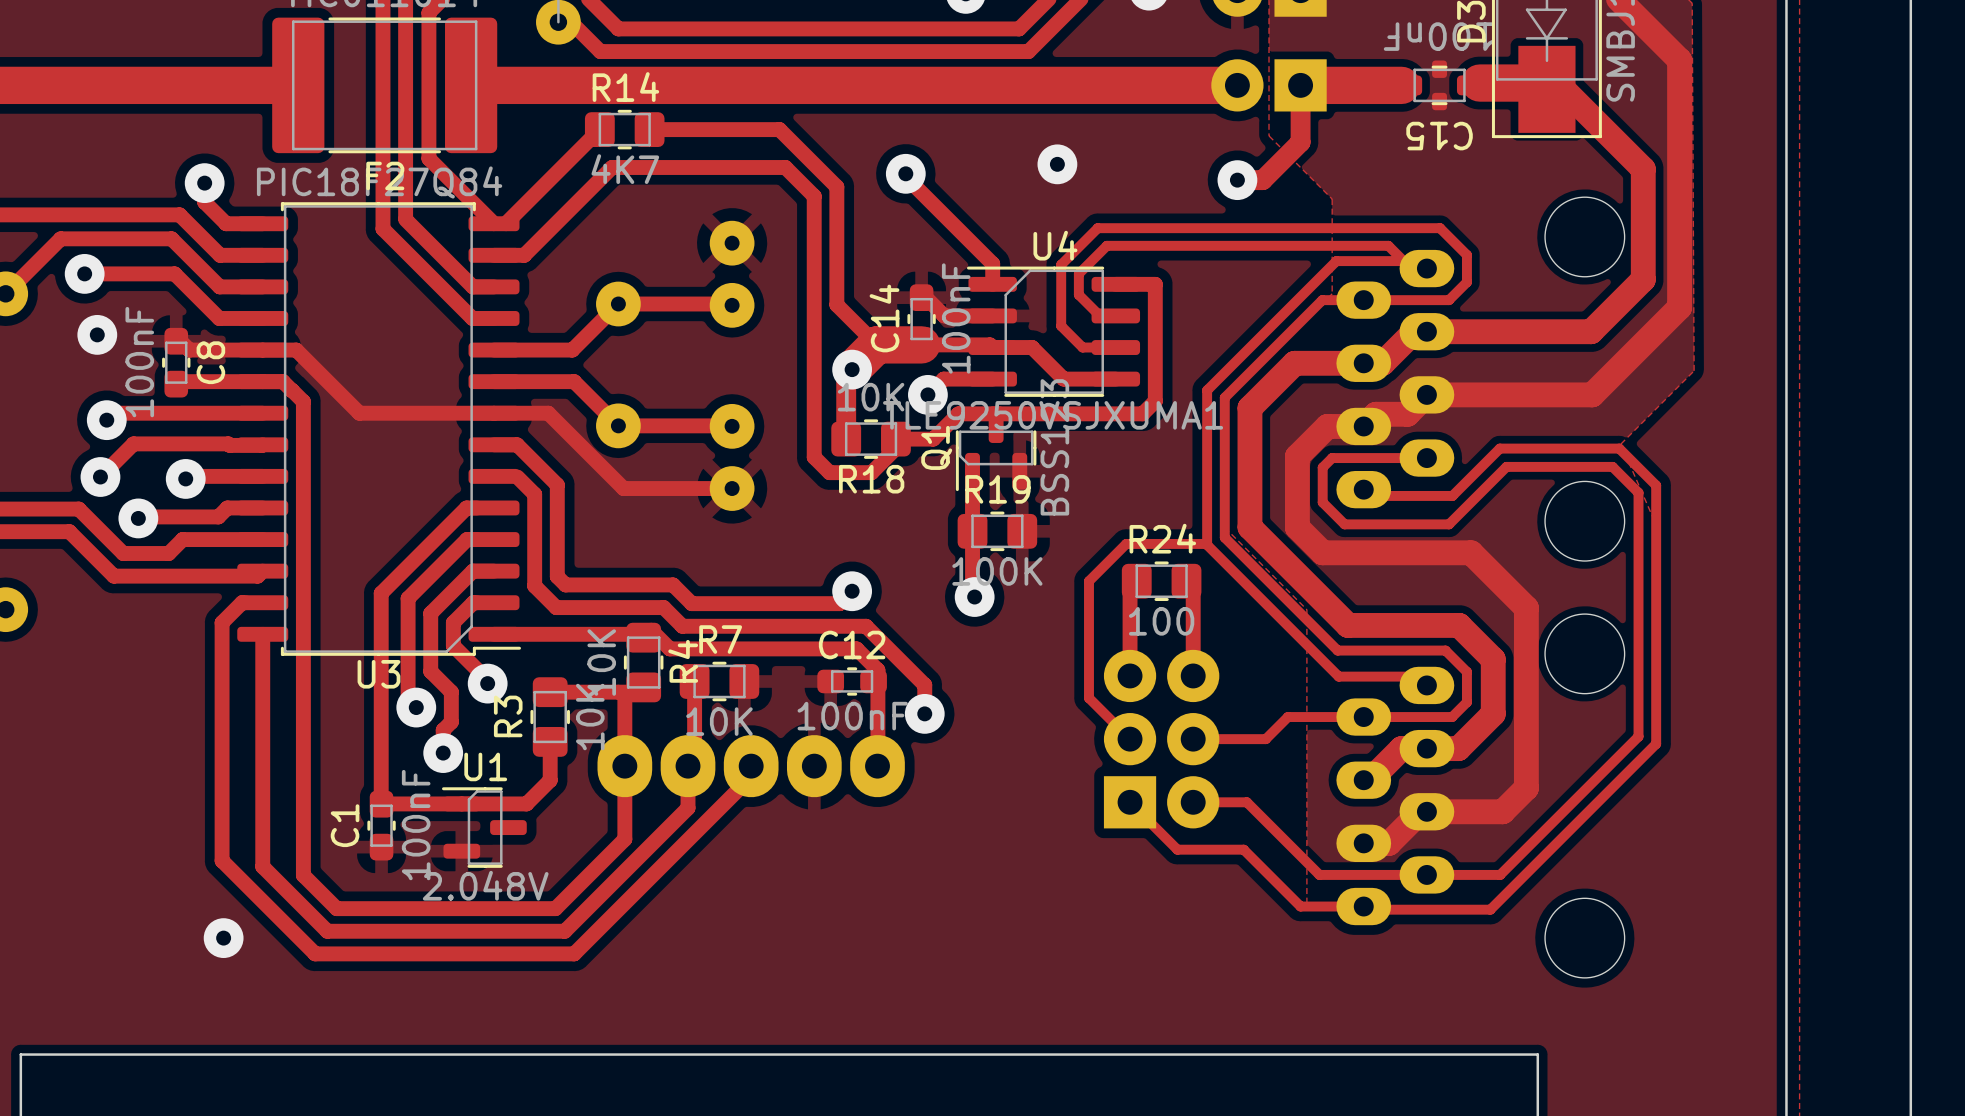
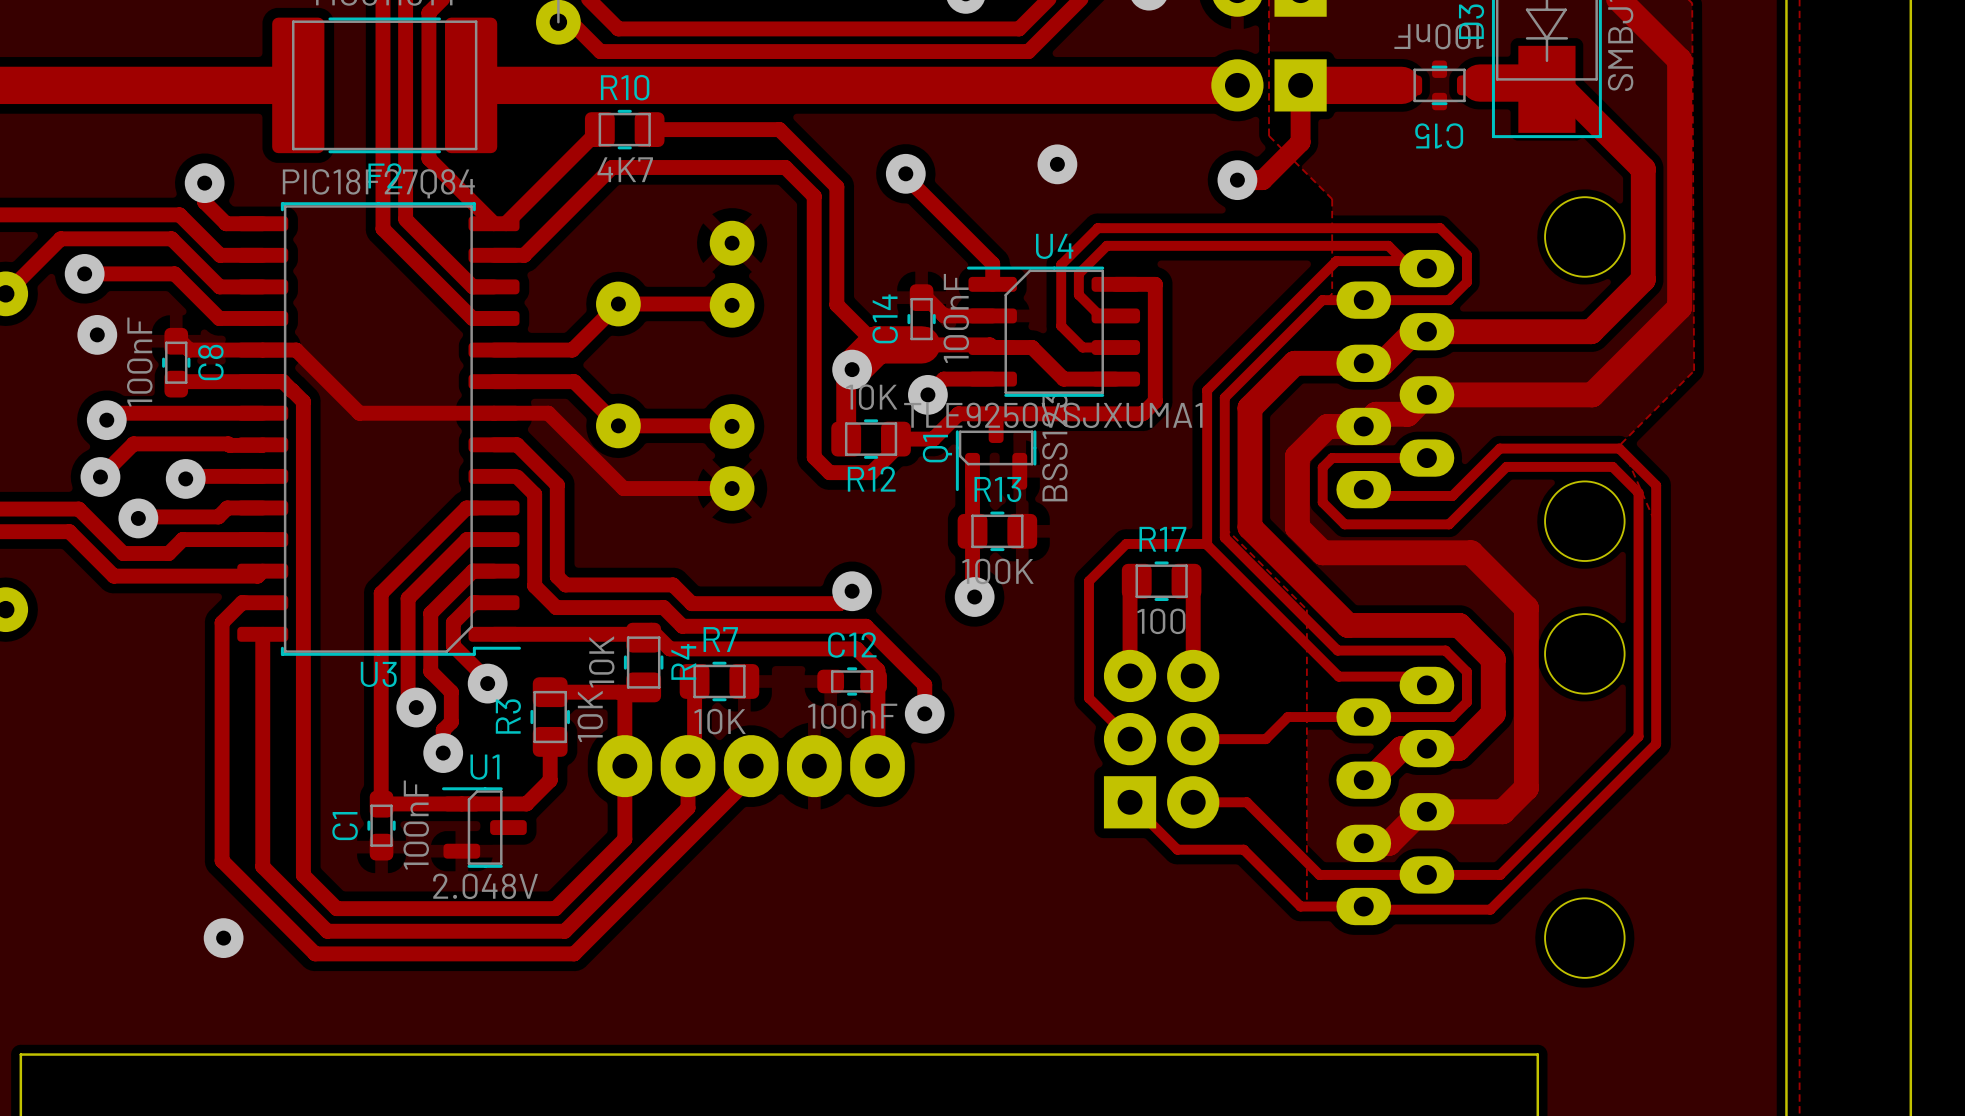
R14 name: R14 (625, 87) -> R10 (625, 87)
R18 name: R18 (871, 479) -> R12 (871, 479)
R19 name: R19 (997, 489) -> R13 (997, 489)
R24 name: R24 (1162, 538) -> R17 (1162, 539)

